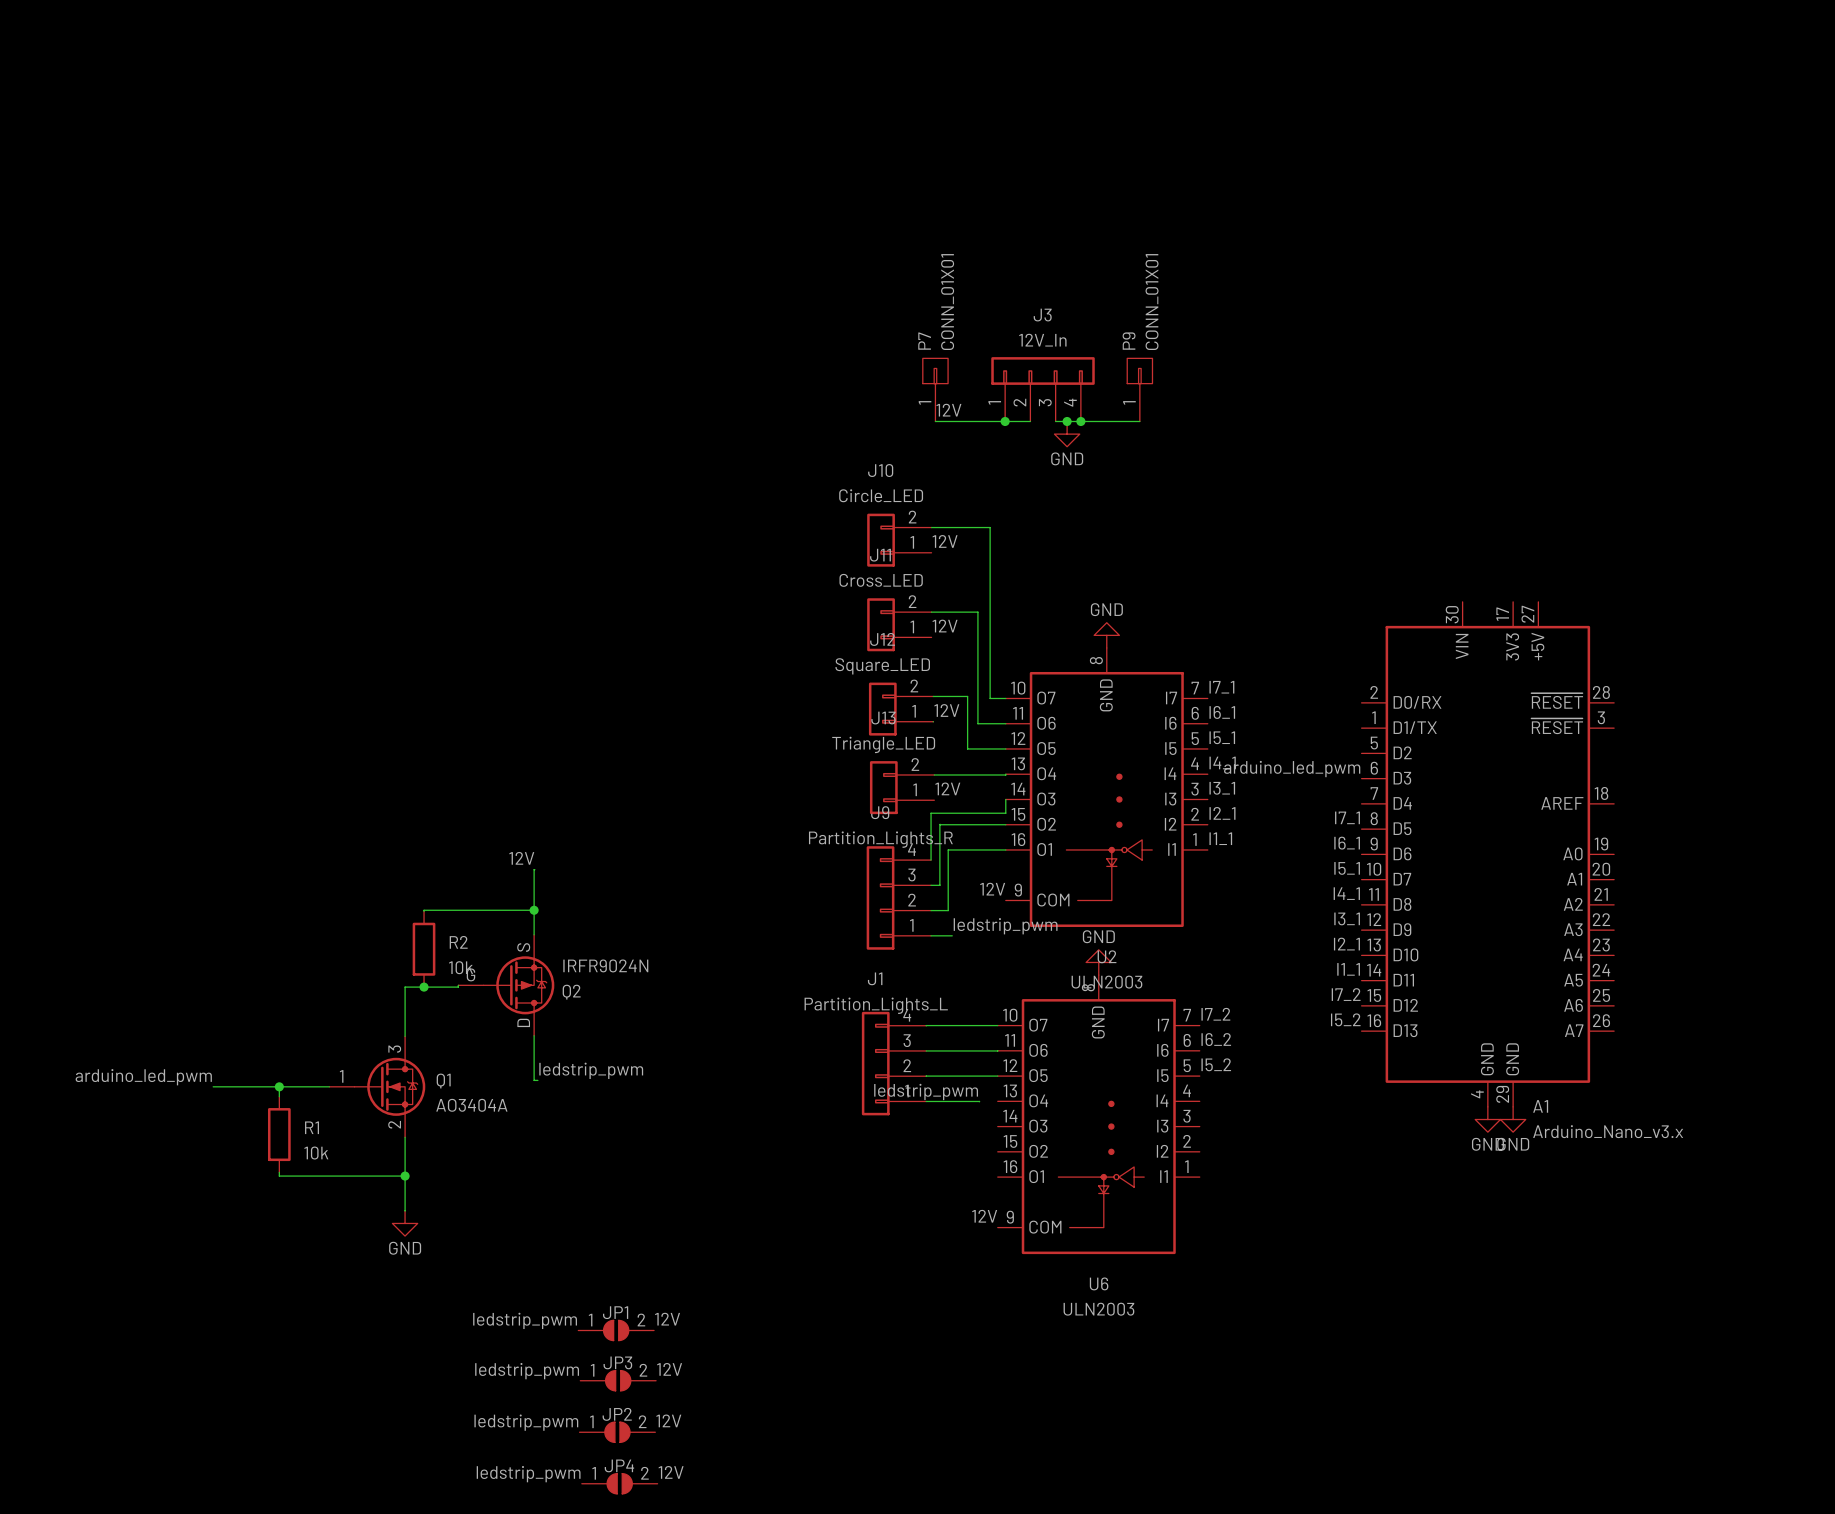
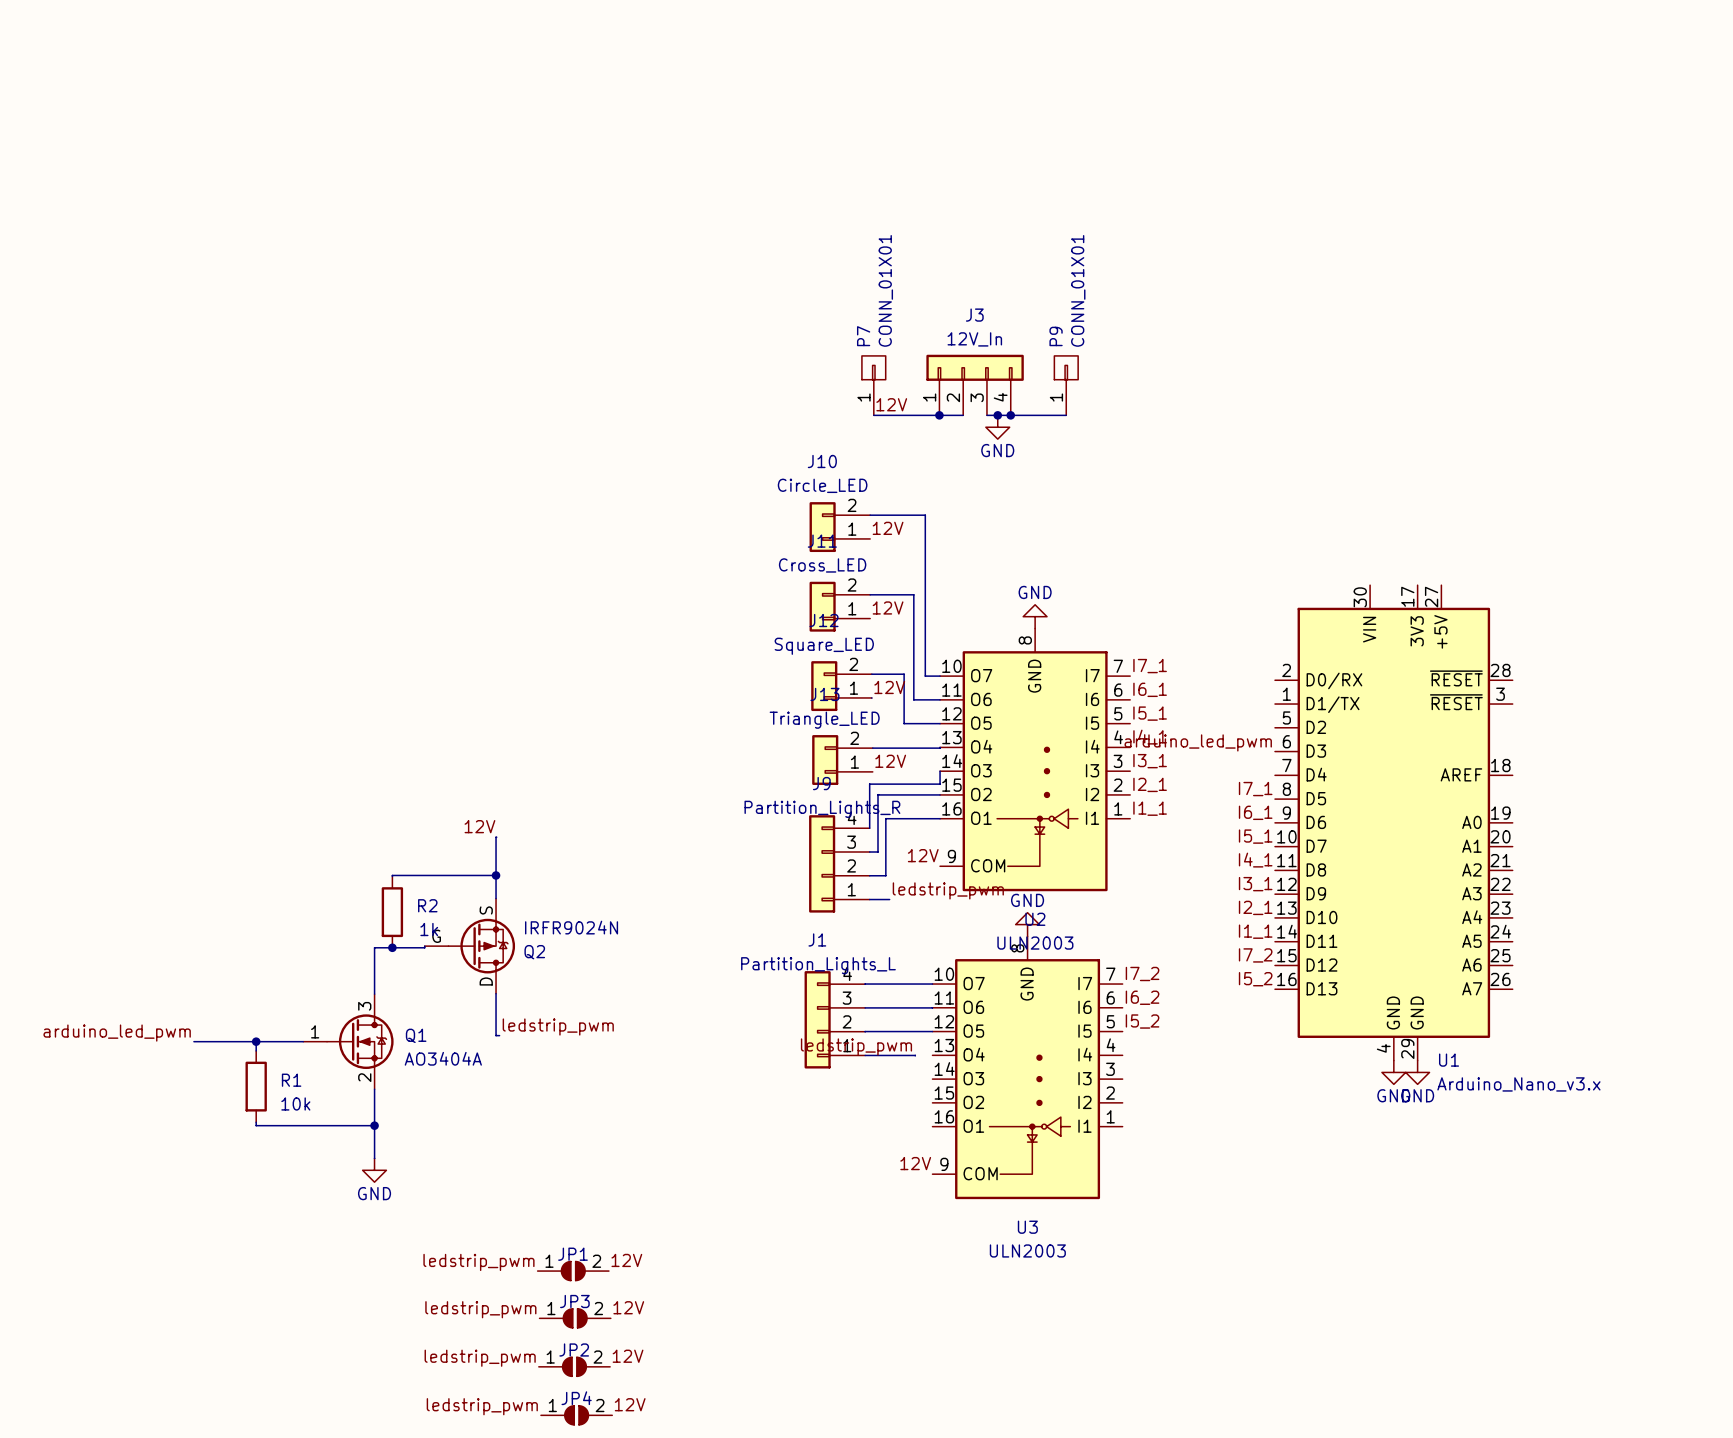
R2 value: 10k (461, 967) -> 1k (429, 929)
A1 name: A1 (1540, 1106) -> U1 (1449, 1060)
U6 name: U6 (1099, 1283) -> U3 (1027, 1227)

